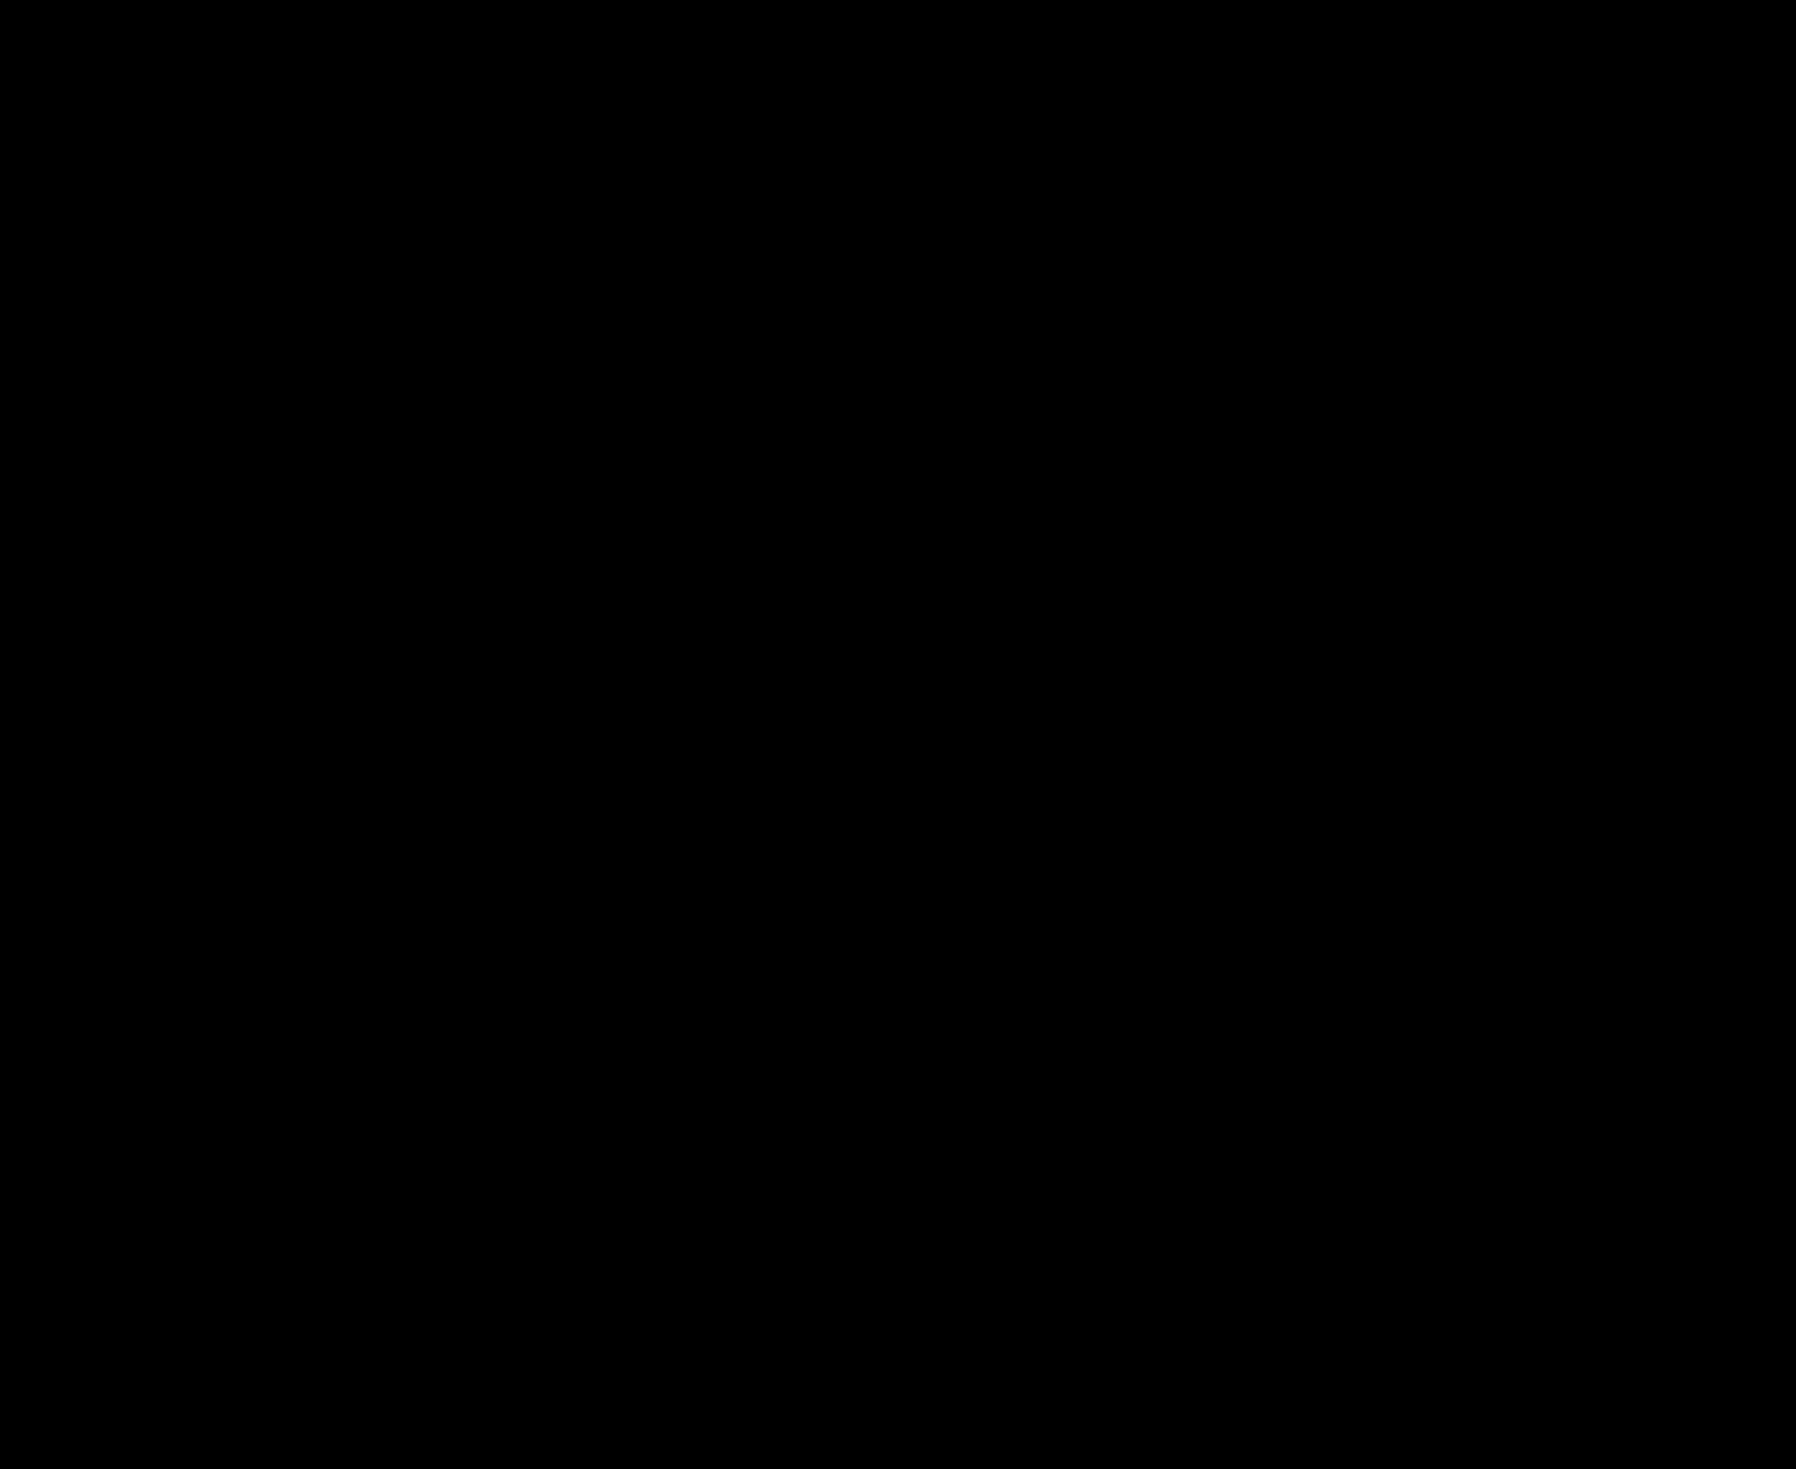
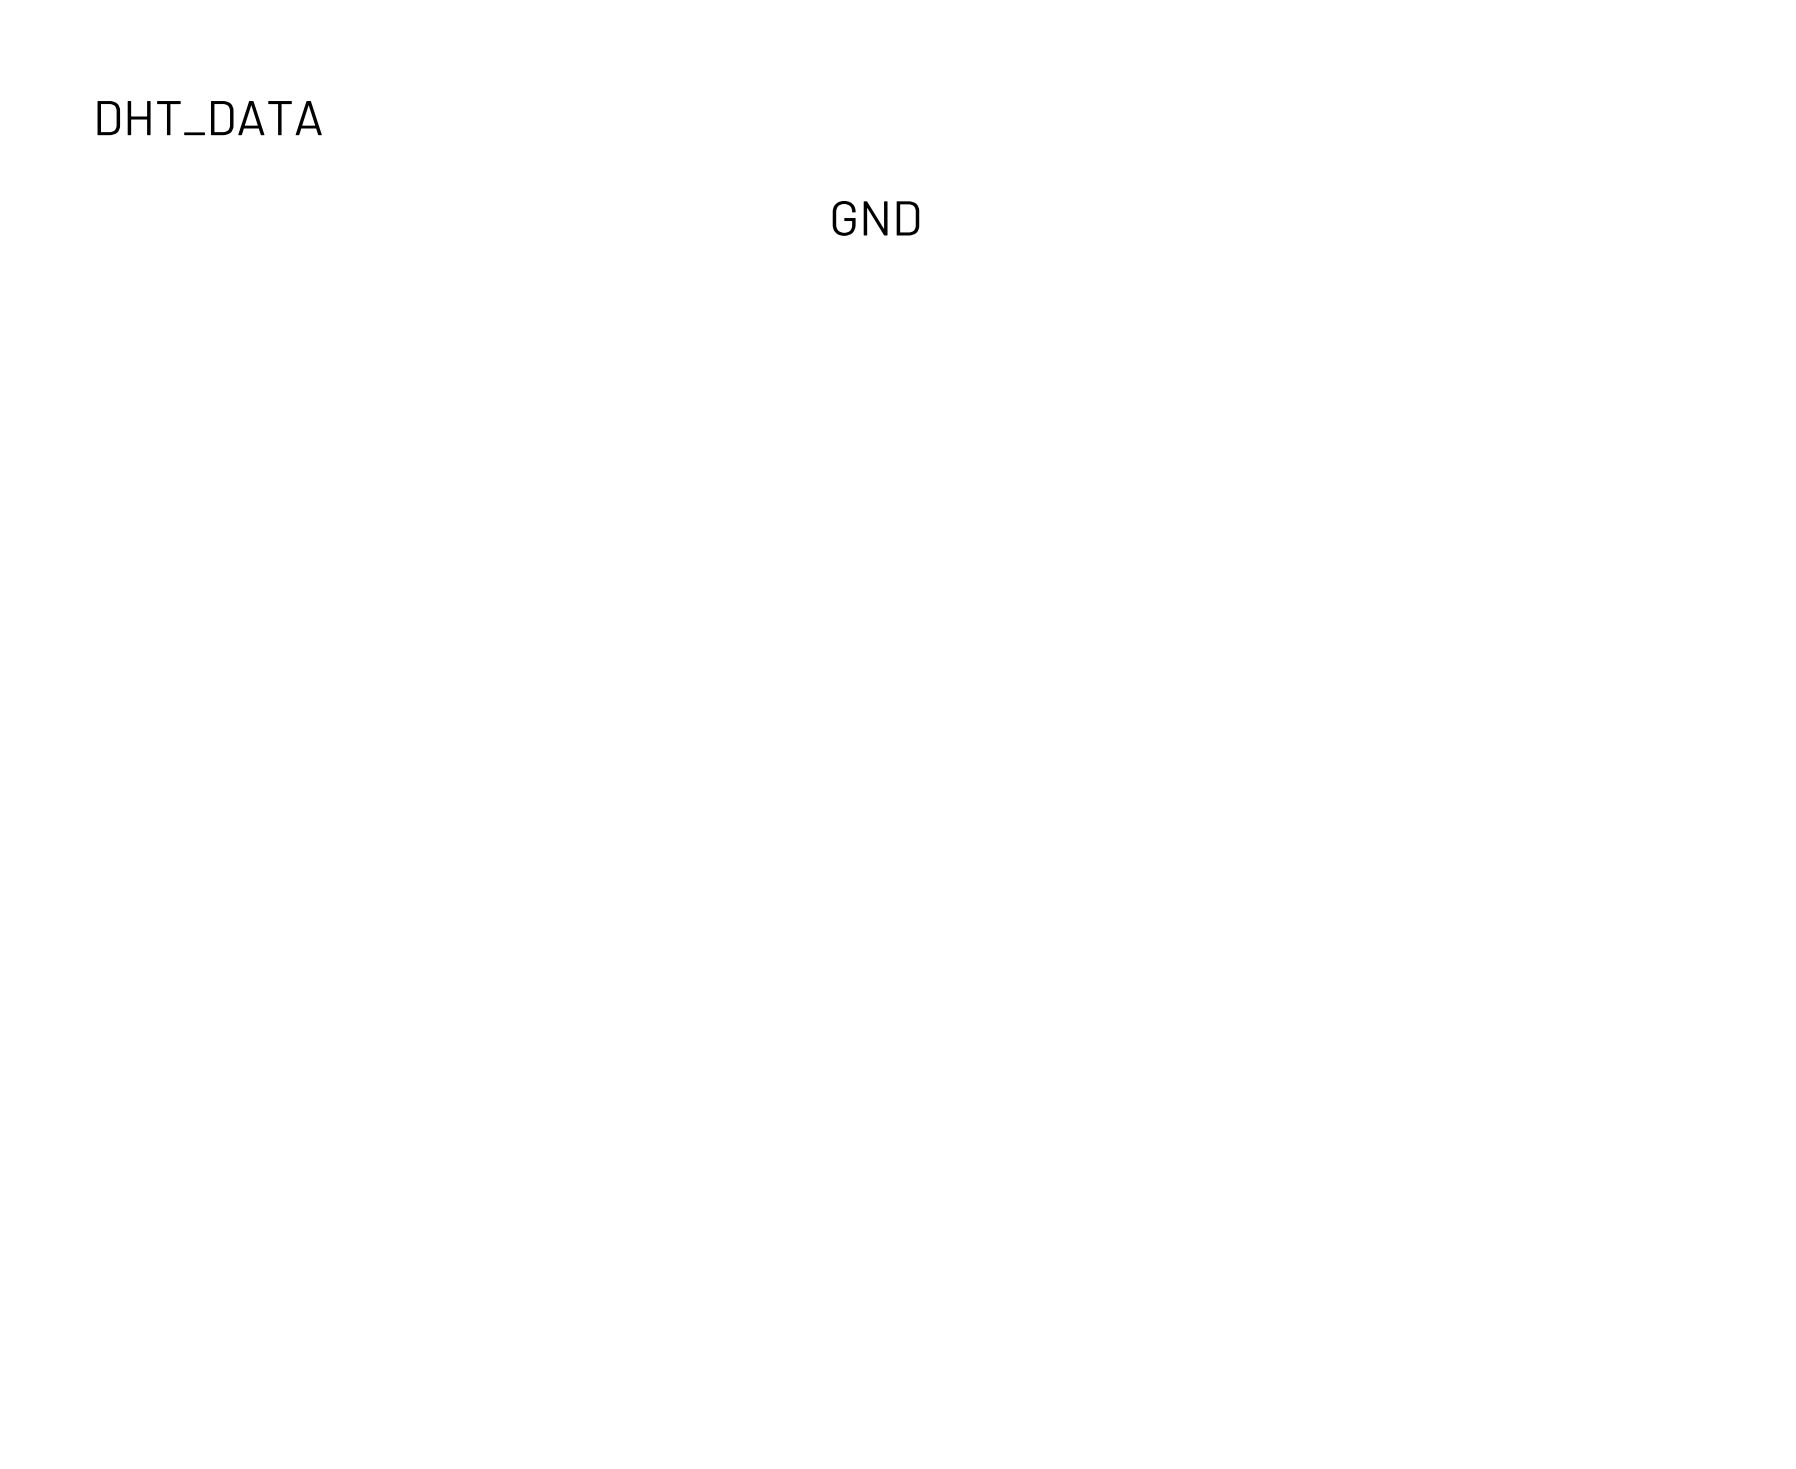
label: none -> DHT_DATA (209, 118)
label: none -> GND (875, 218)

